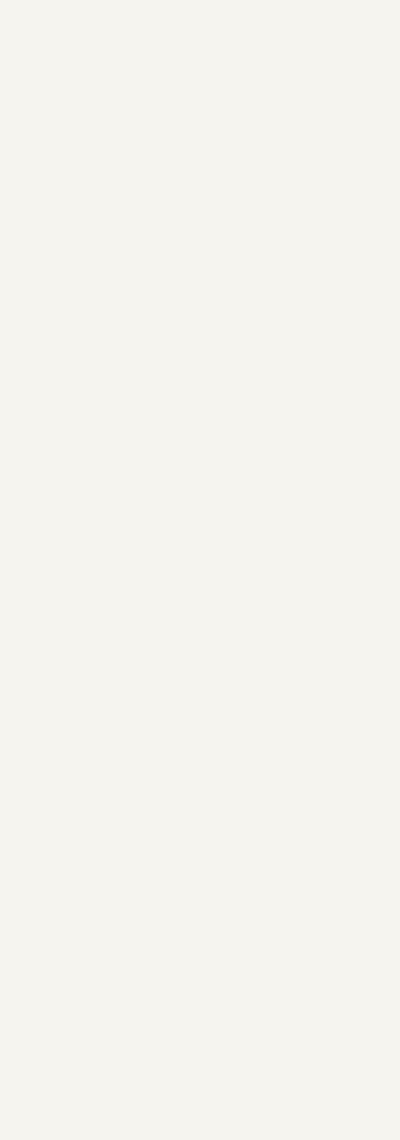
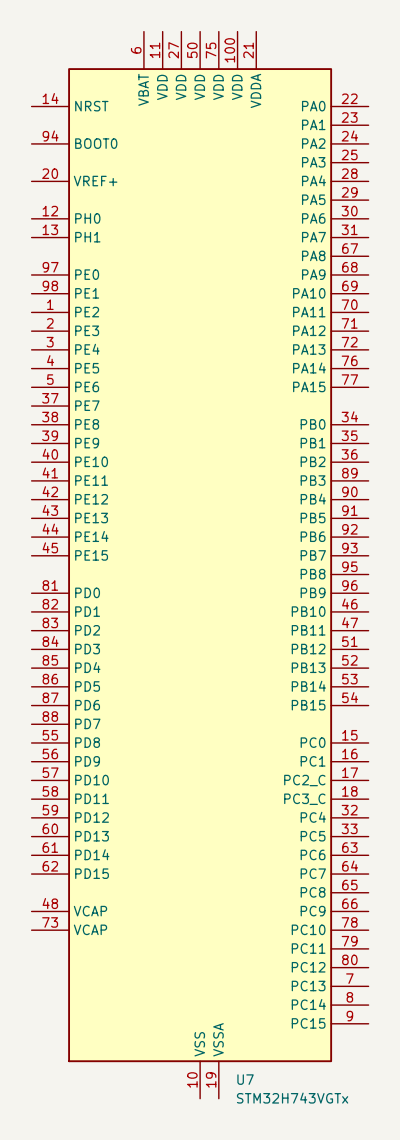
U7: none -> STM32H743VGTx (200, 565)

